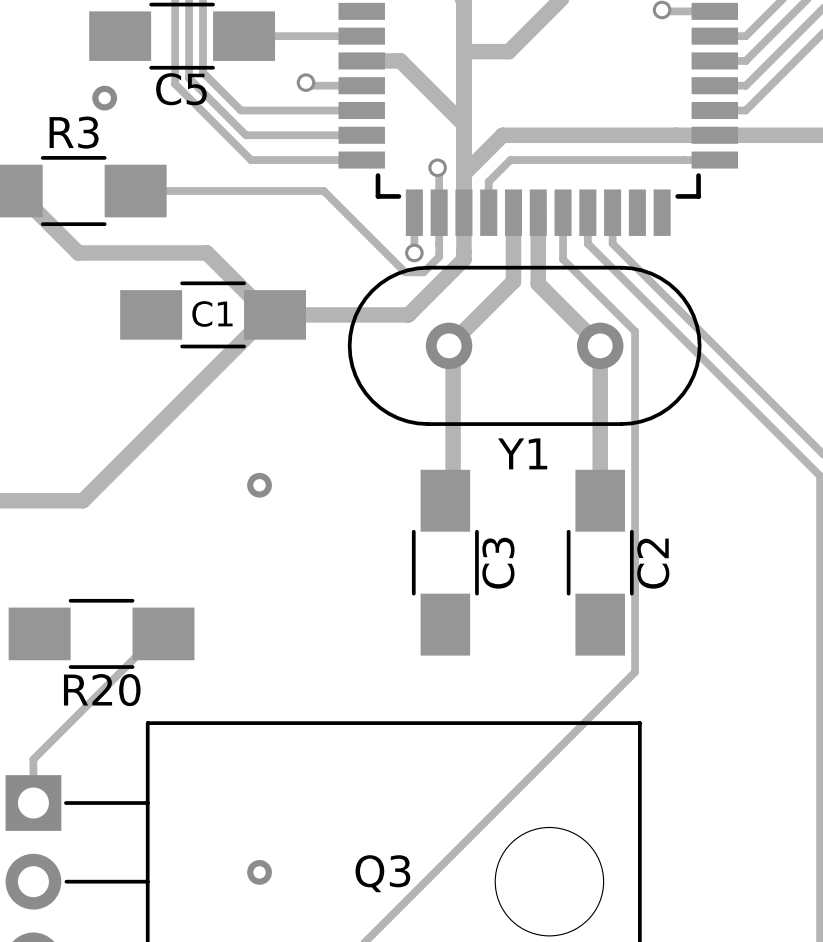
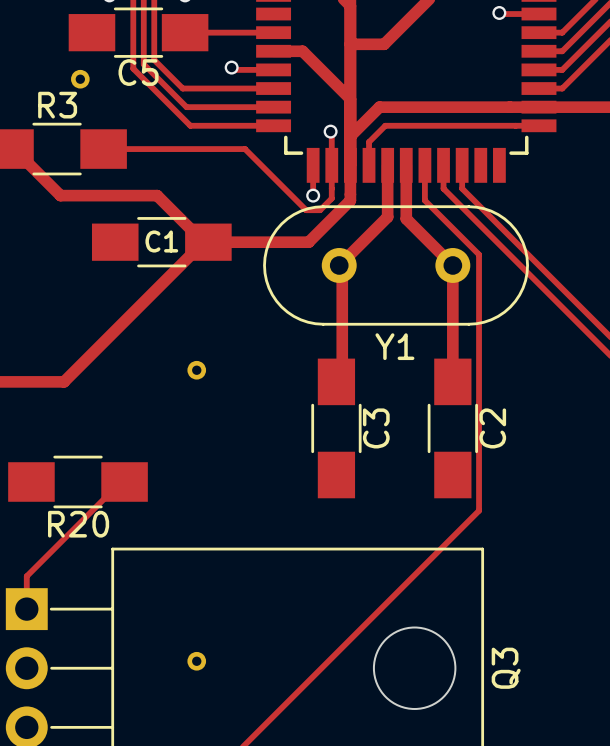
Q3 name rotation: 0° (382, 873) -> 90° counterclockwise (506, 668)
Q3 name position: Q3 (382, 873) -> Q3 (506, 668)

